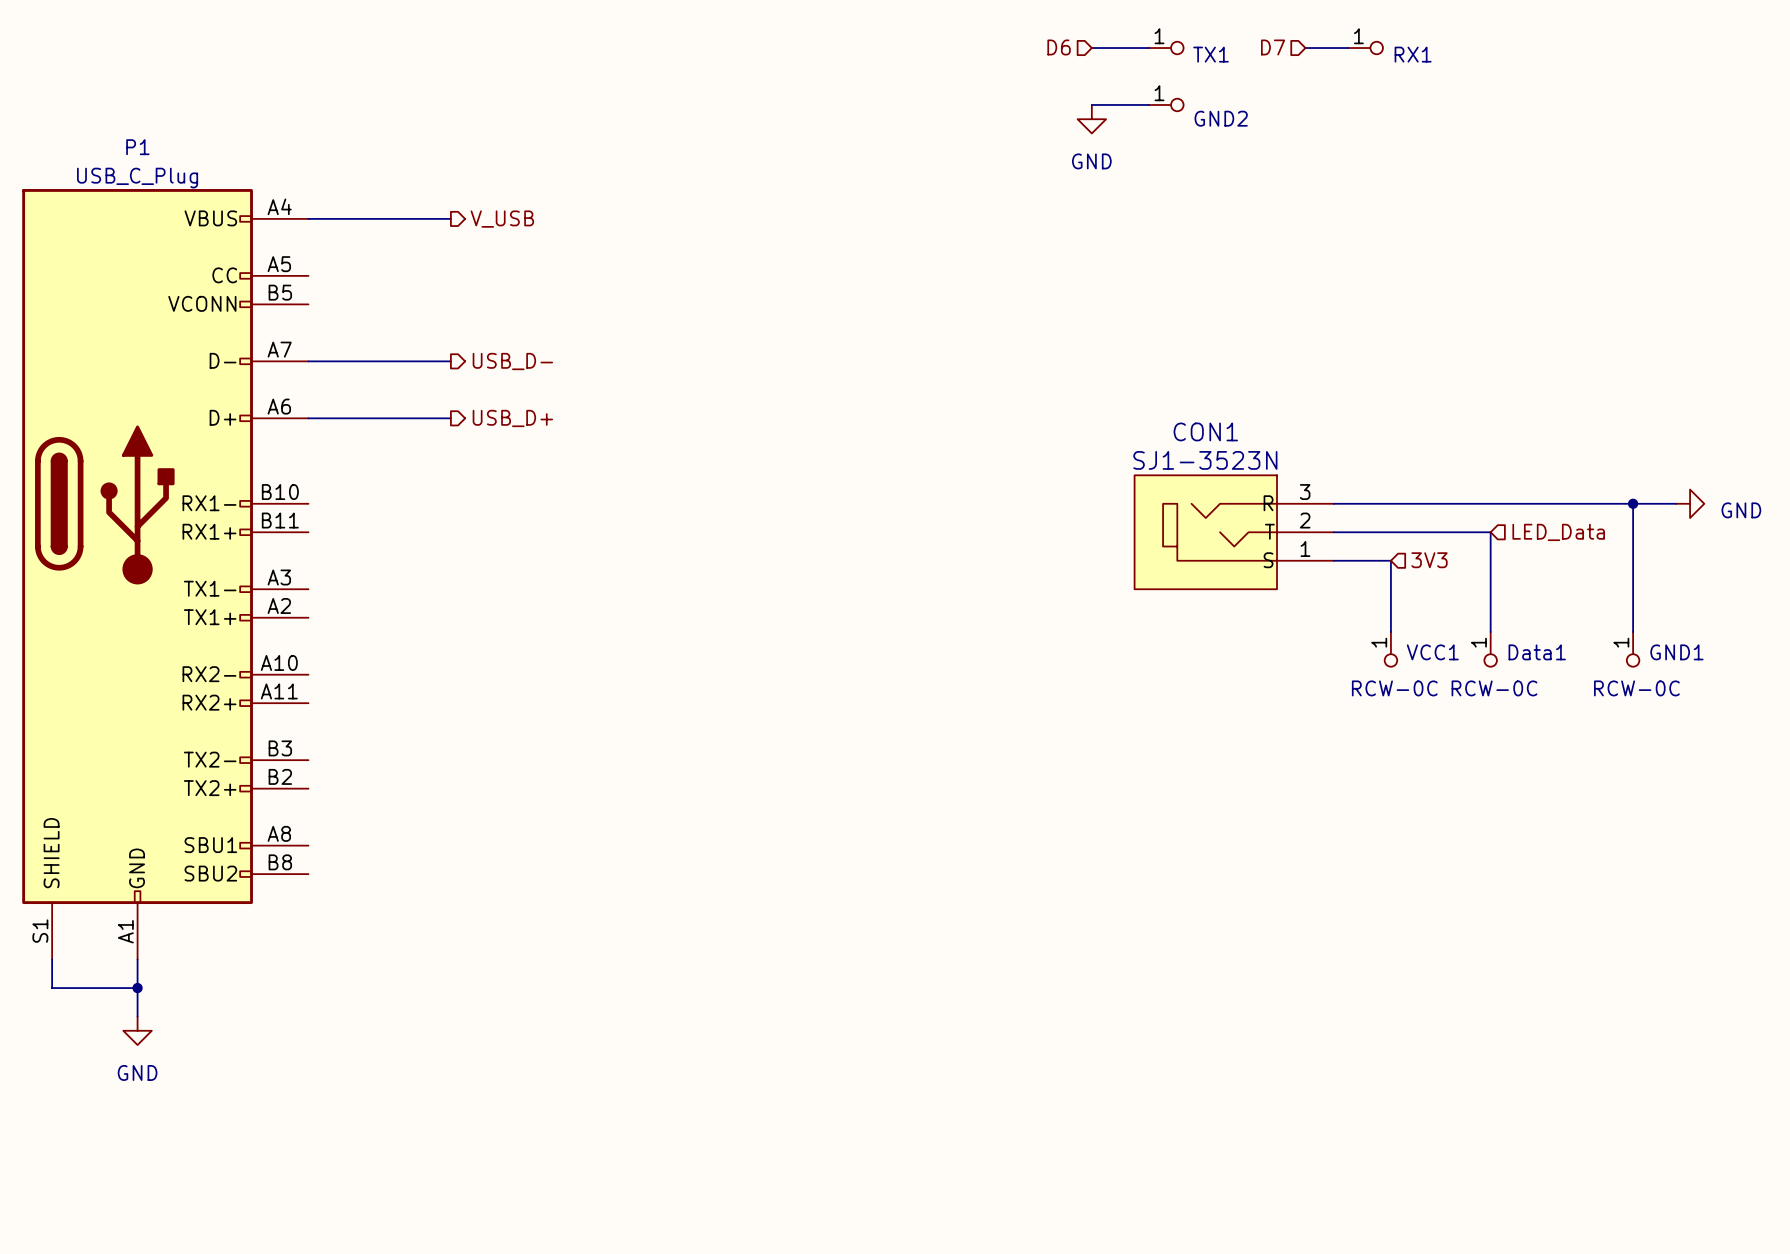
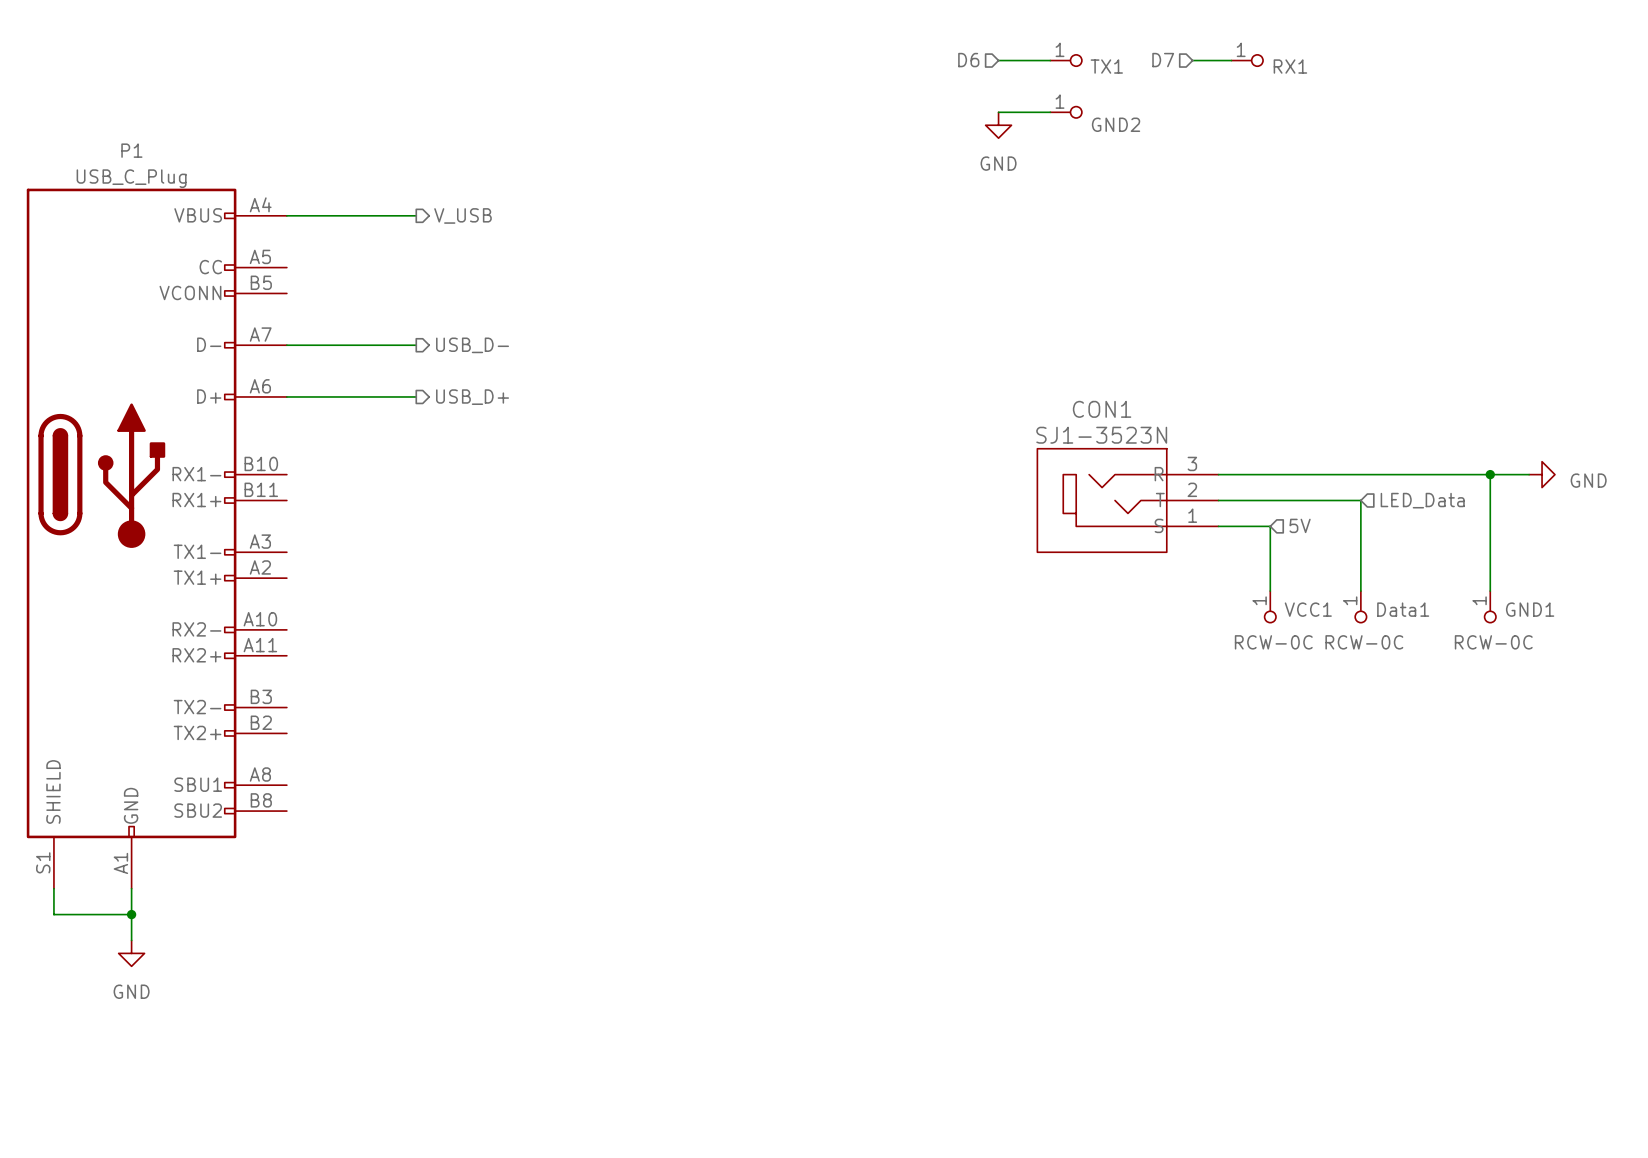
hierarchical label: 3V3 (1429, 560) -> 5V (1300, 525)

